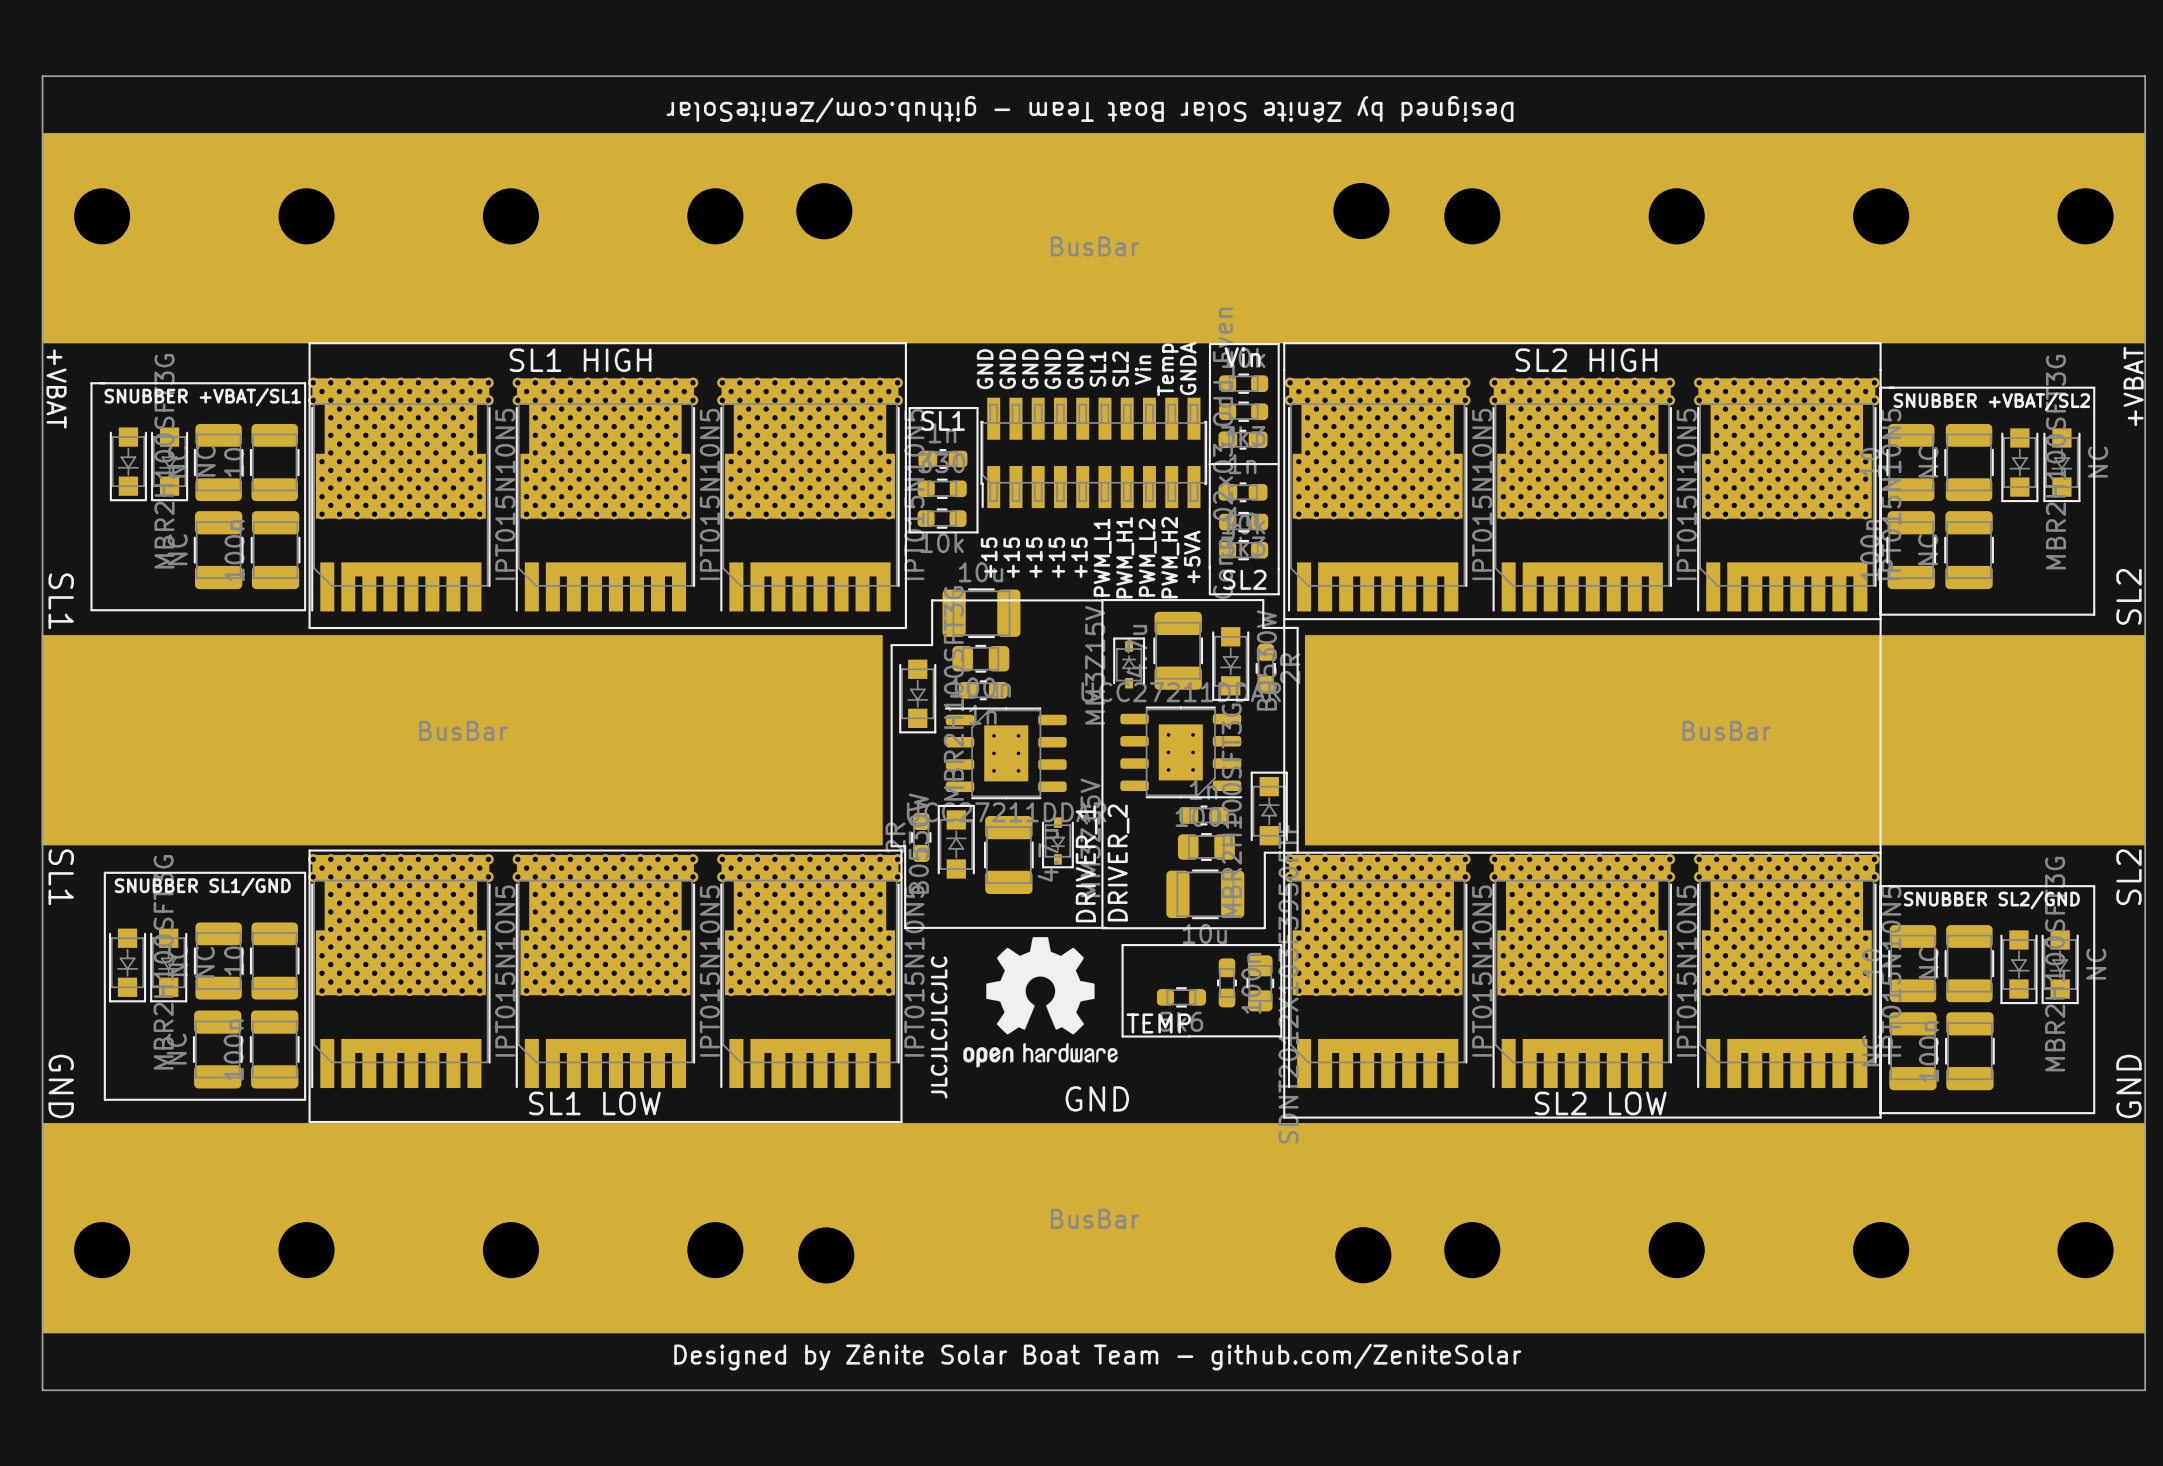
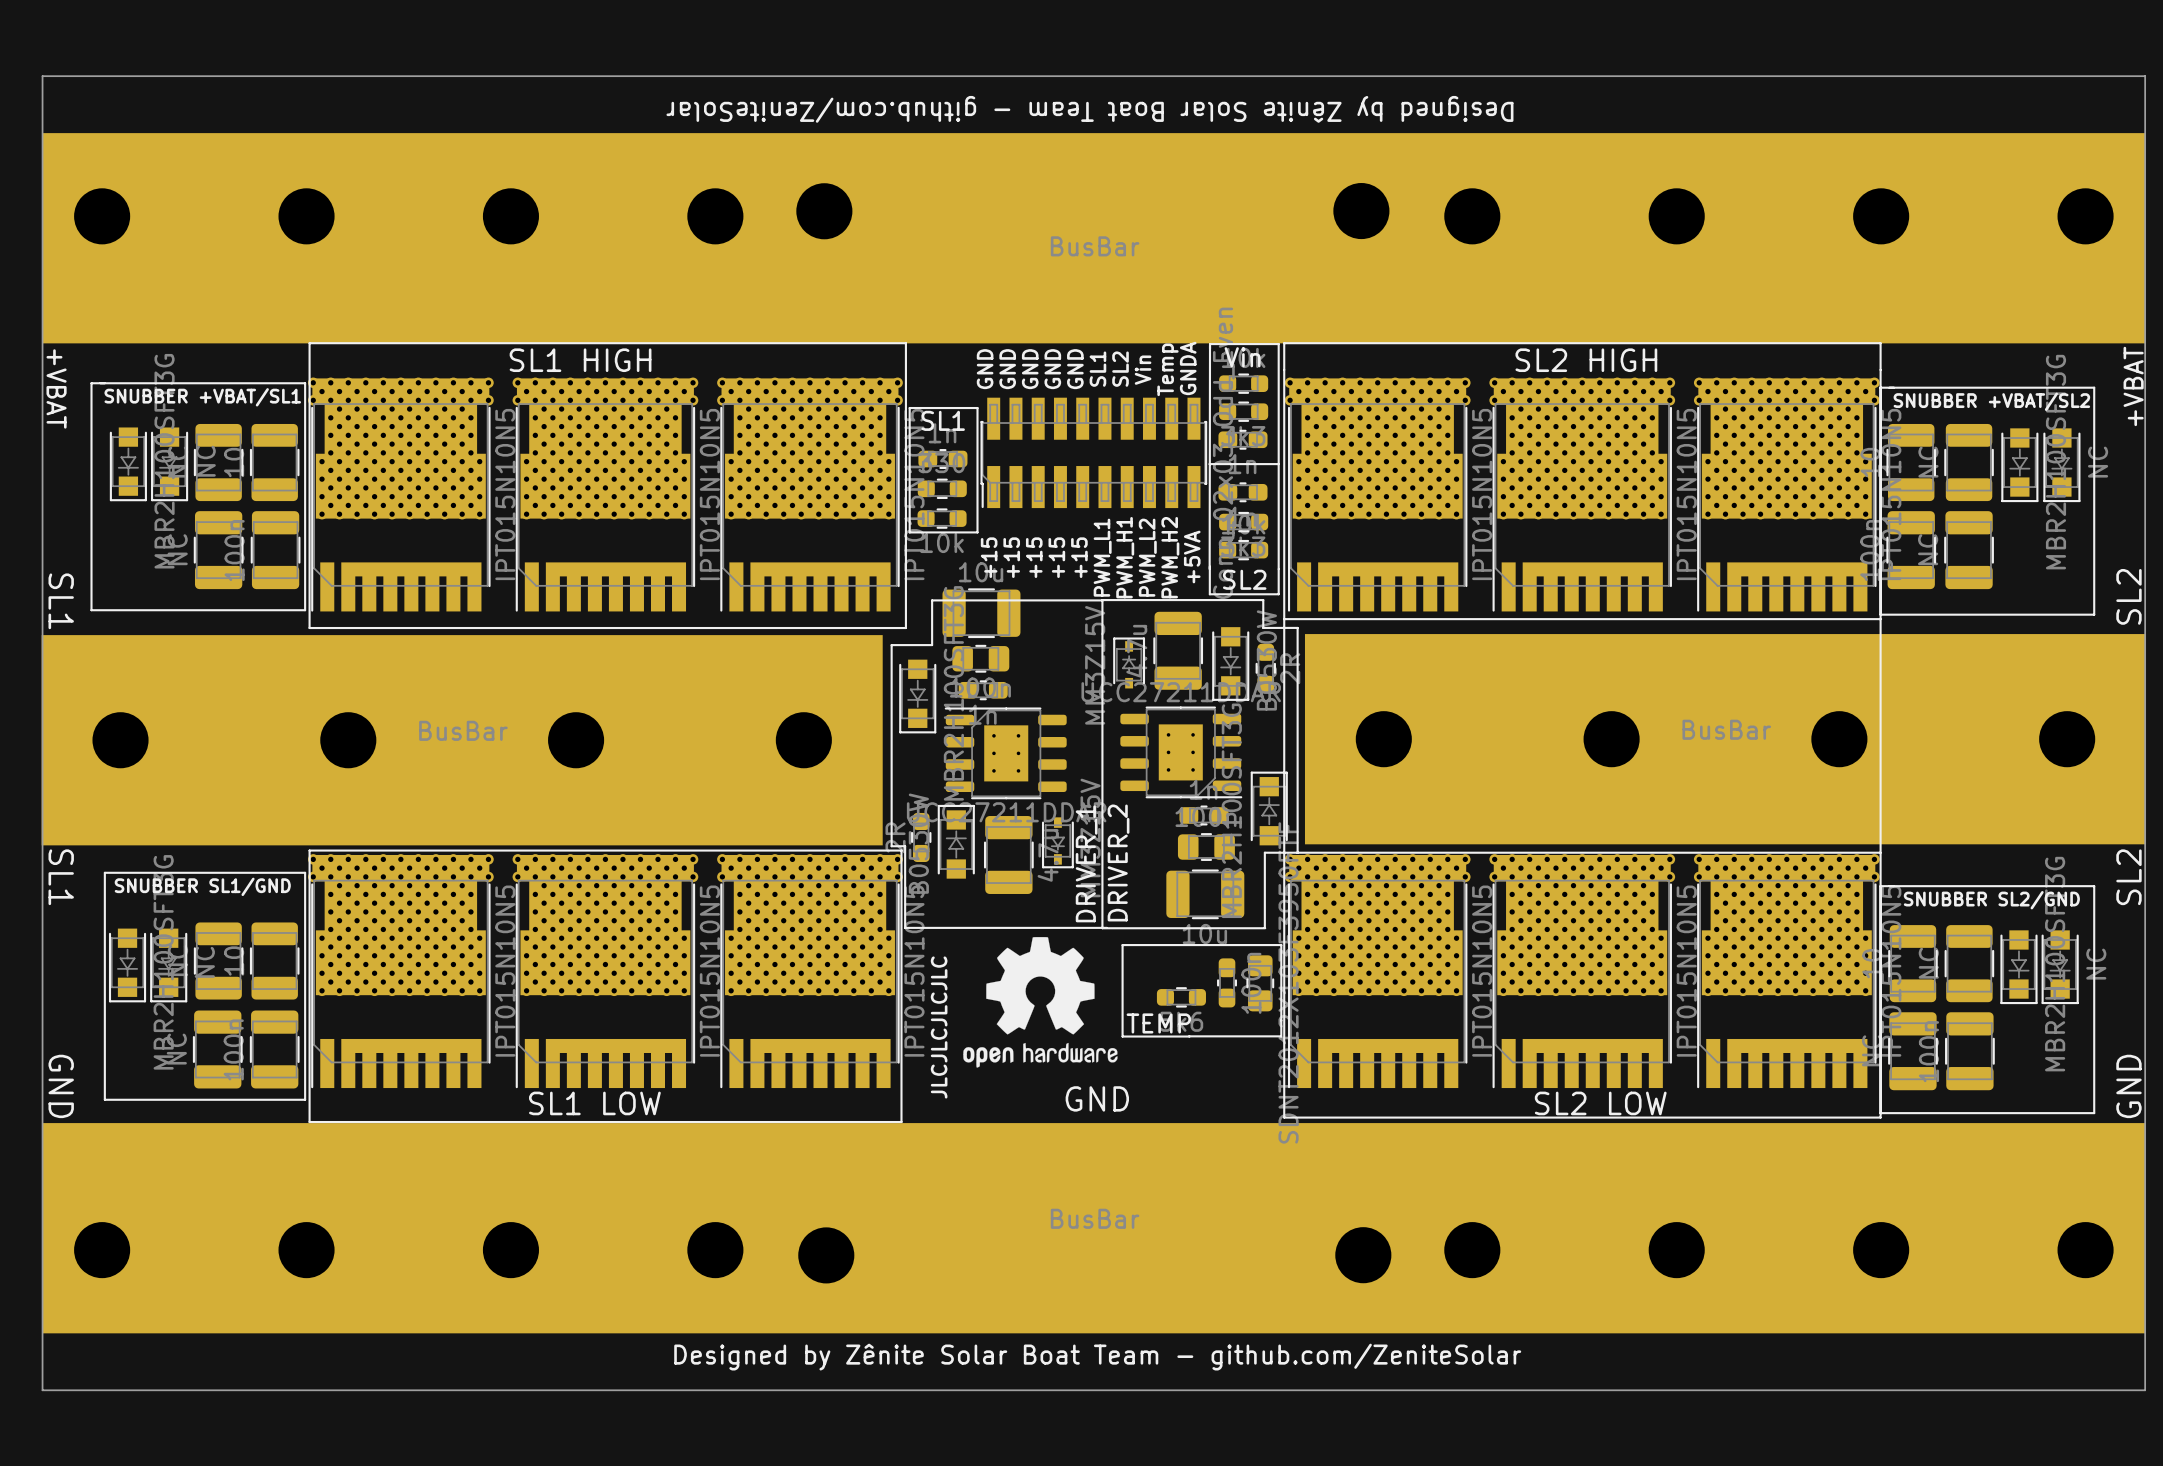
part footprint: [41, 635, 883, 846] -> [41, 635, 883, 846]
part footprint: [1304, 635, 2147, 846] -> [1304, 634, 2147, 845]

